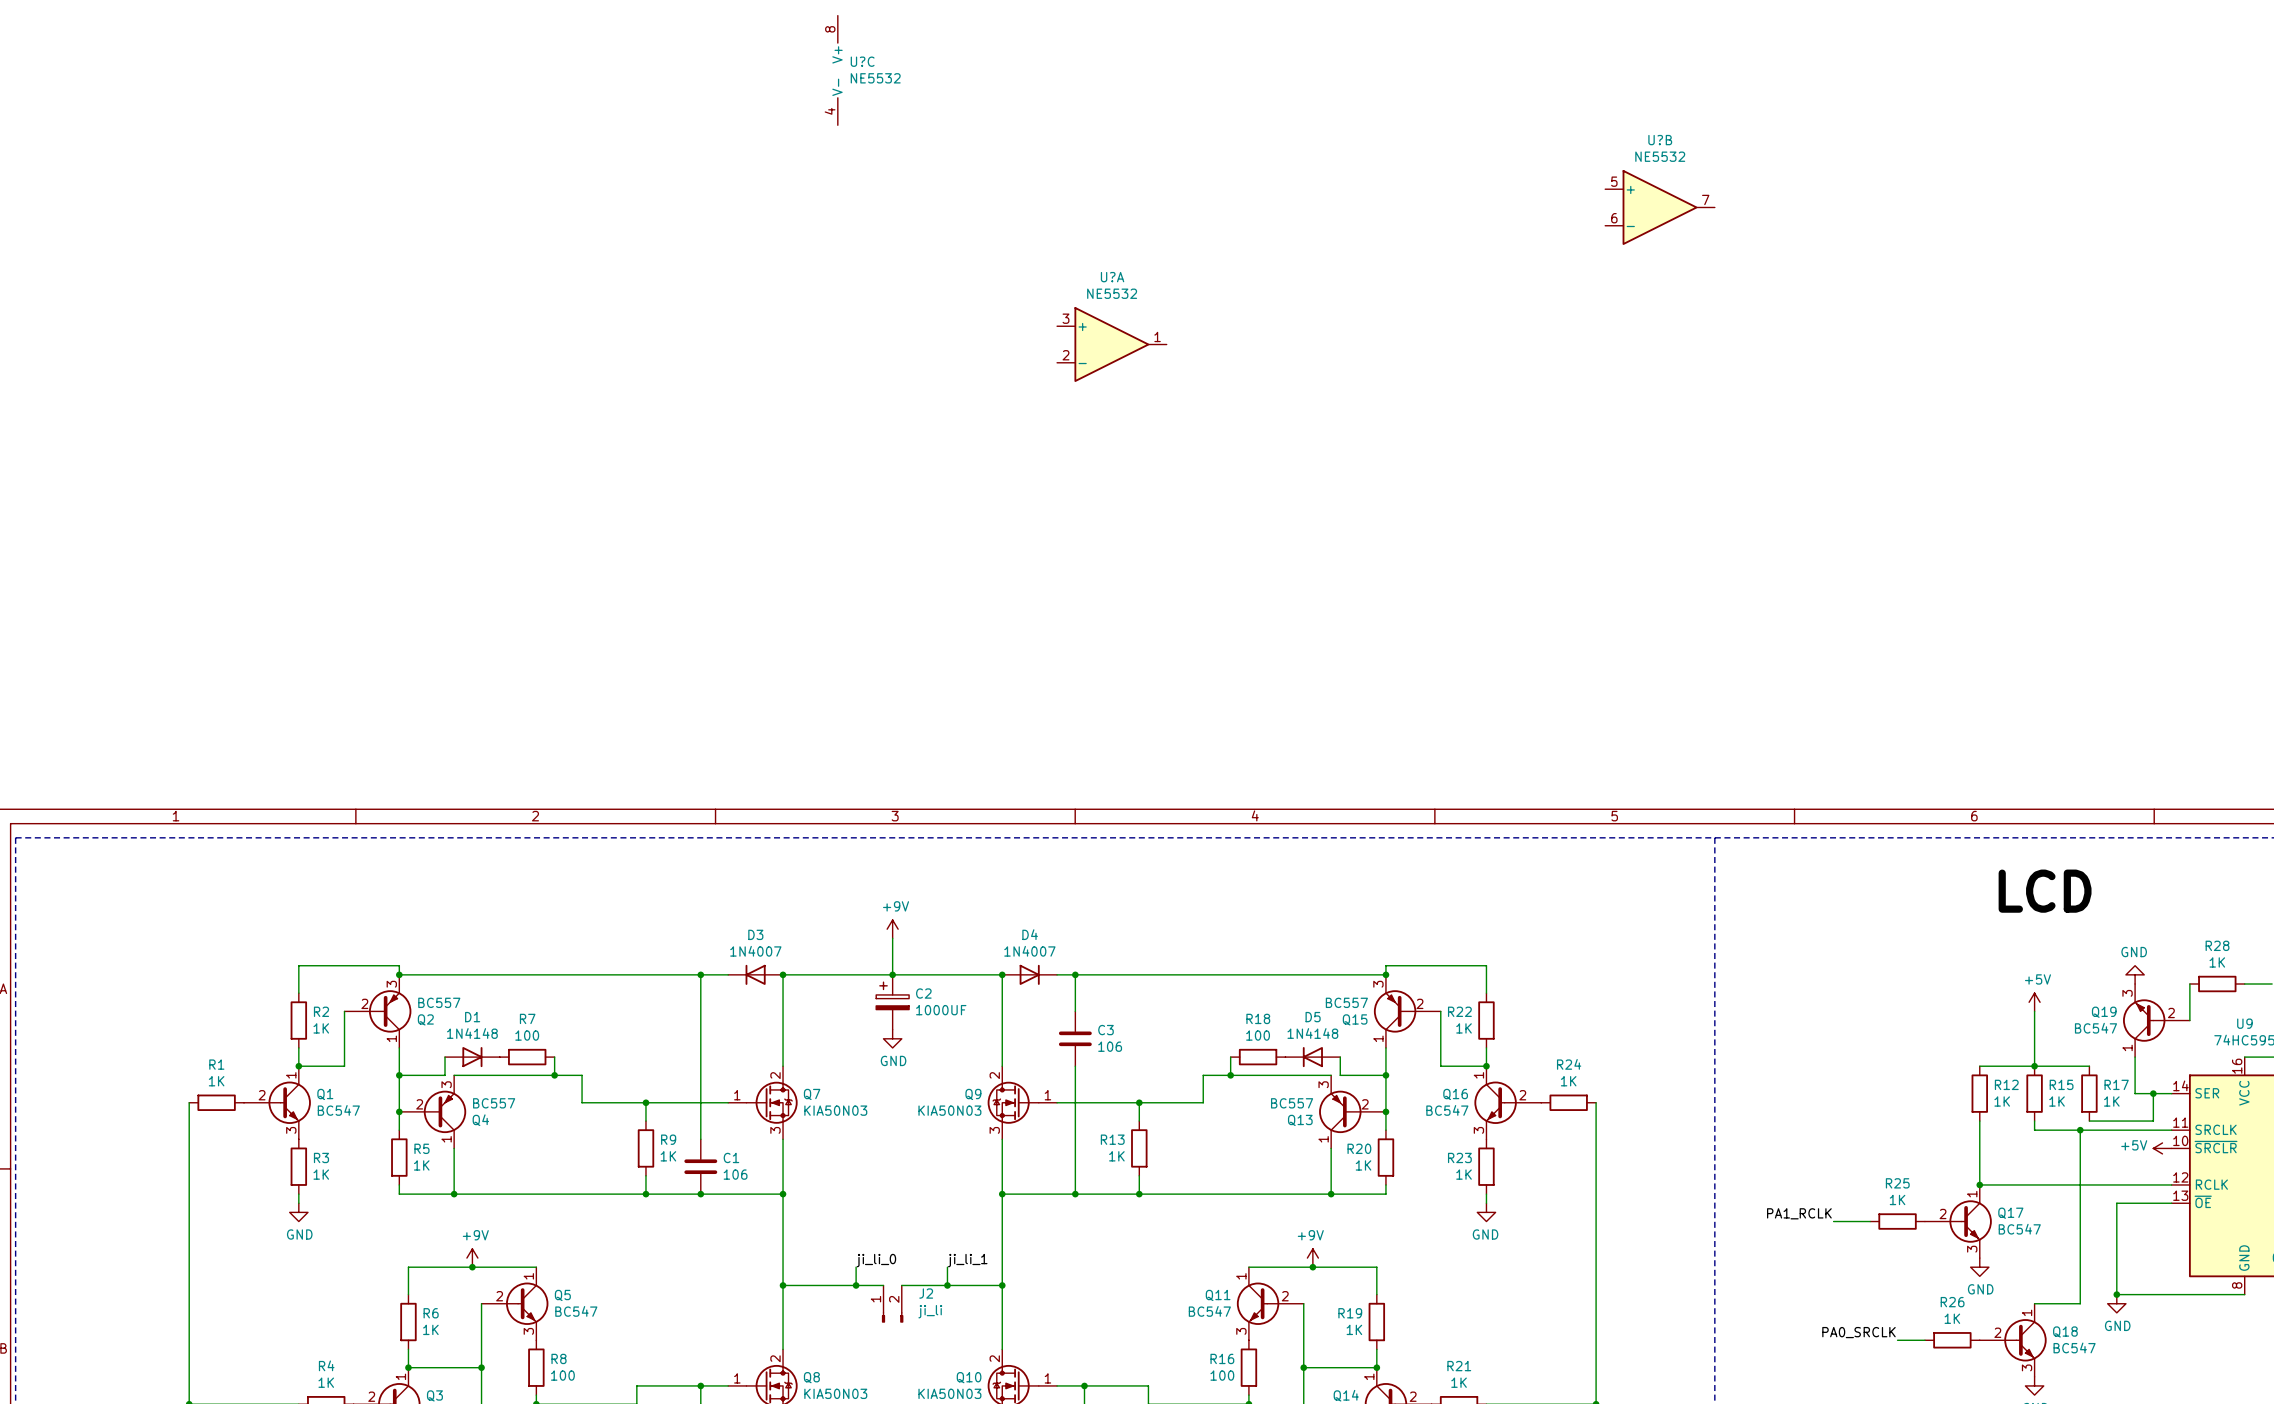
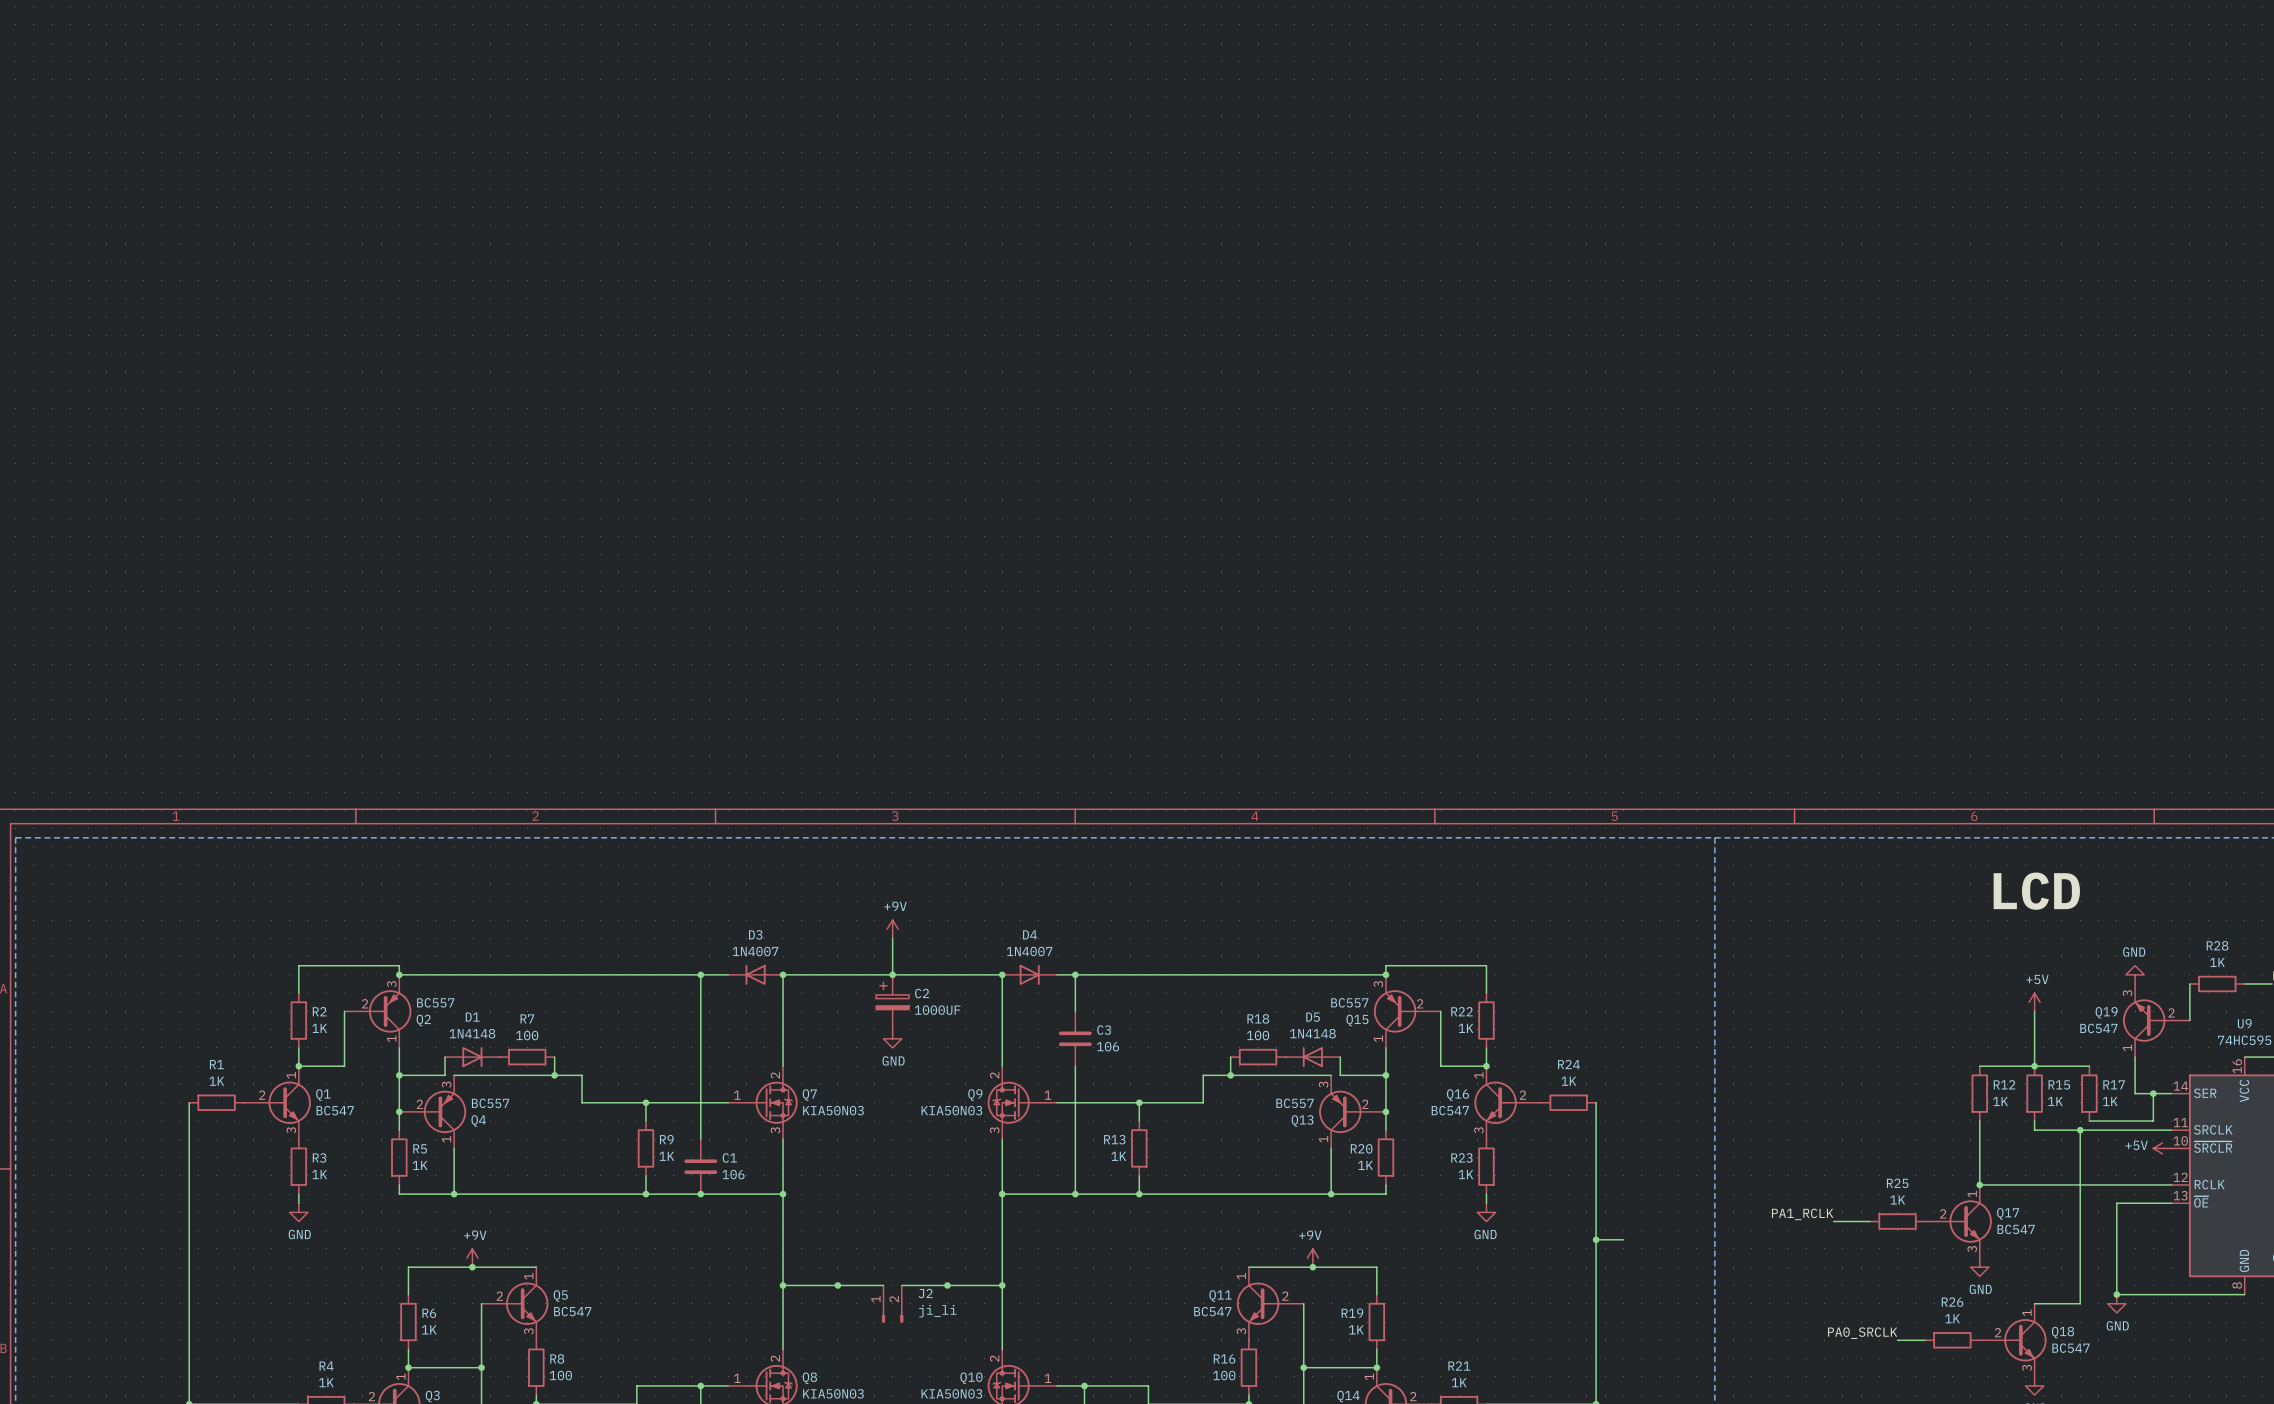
U?C: NE5532 (837, 70) -> none
U?B: NE5532 (1660, 207) -> none
U?A: NE5532 (1111, 344) -> none
wire: none -> (1596, 1239) (1623, 1239)
junction: none -> (1596, 1239)
label: ji_li_0 (876, 1260) -> none
label: ji_li_1 (967, 1260) -> none
wire: (856, 1267) (856, 1285) -> none
wire: (947, 1267) (947, 1285) -> none
junction position: (856, 1285) -> (837, 1285)

